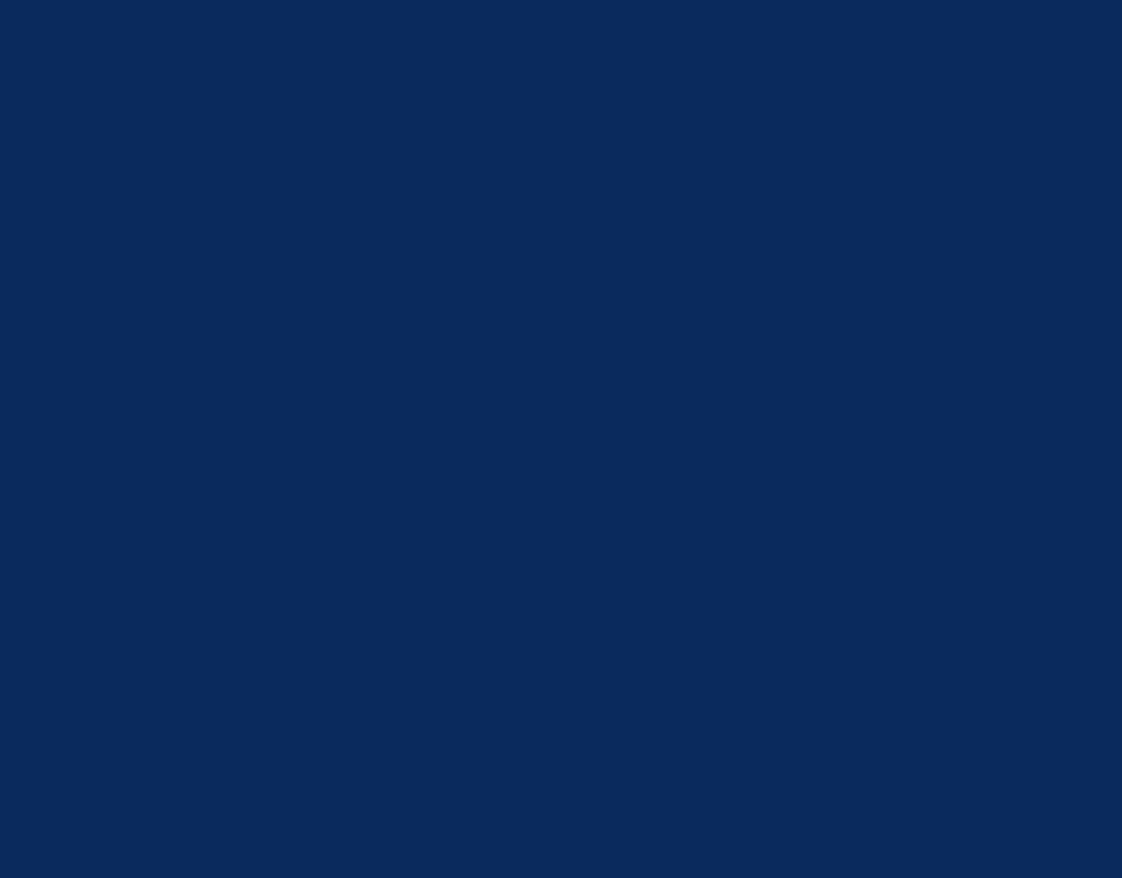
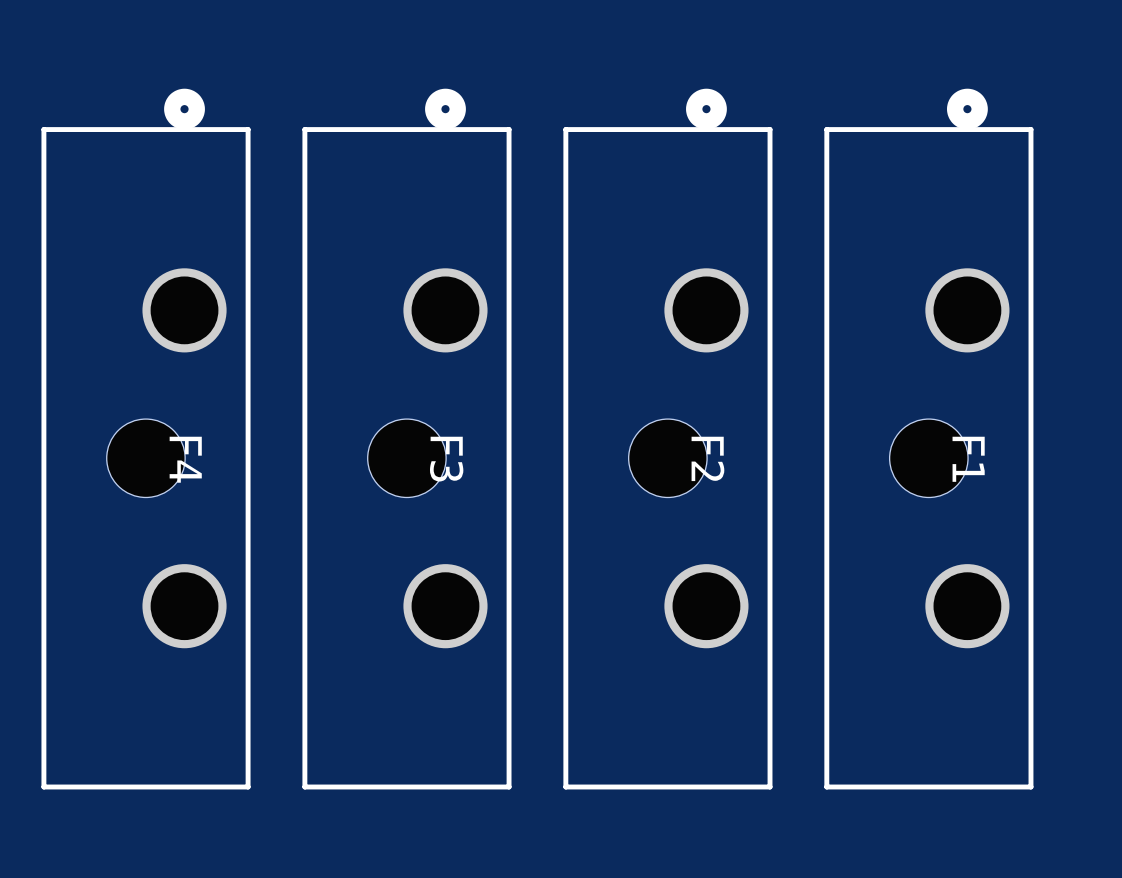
F4: none -> (146, 439)
F3: none -> (406, 439)
F2: none -> (667, 439)
F1: none -> (928, 439)

